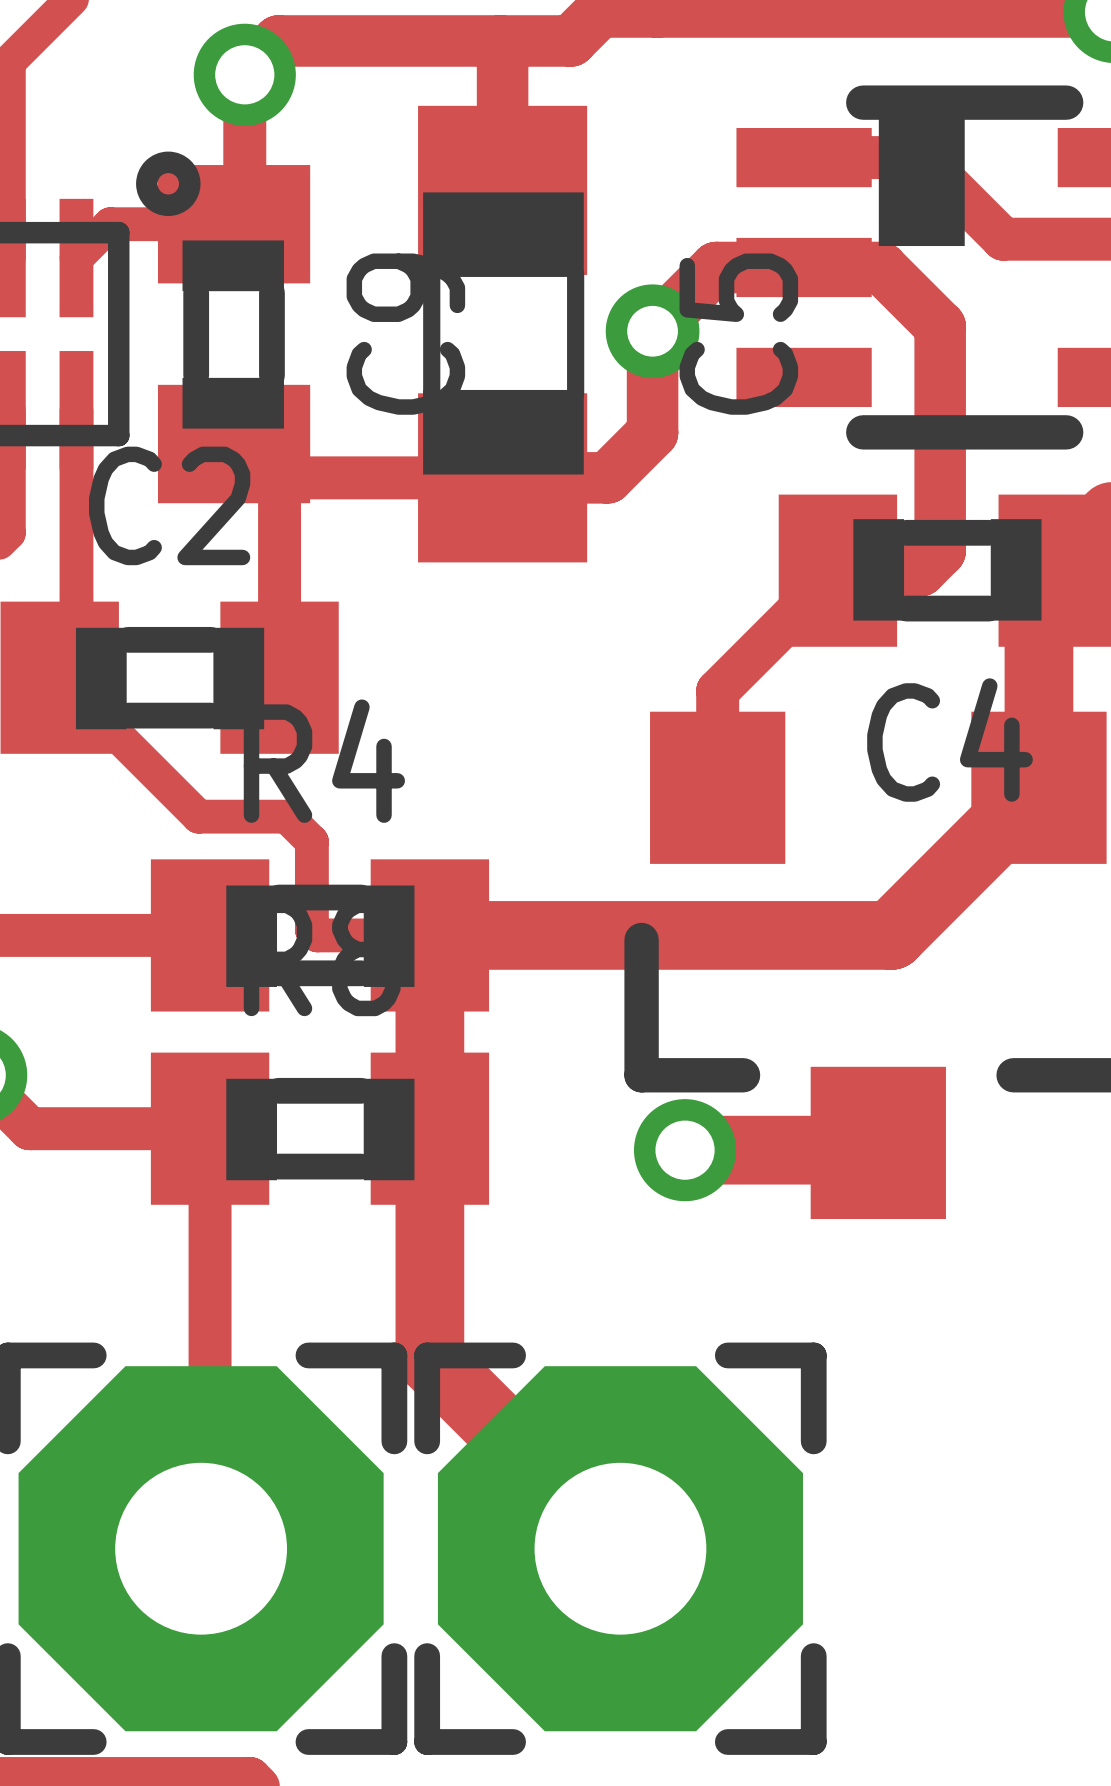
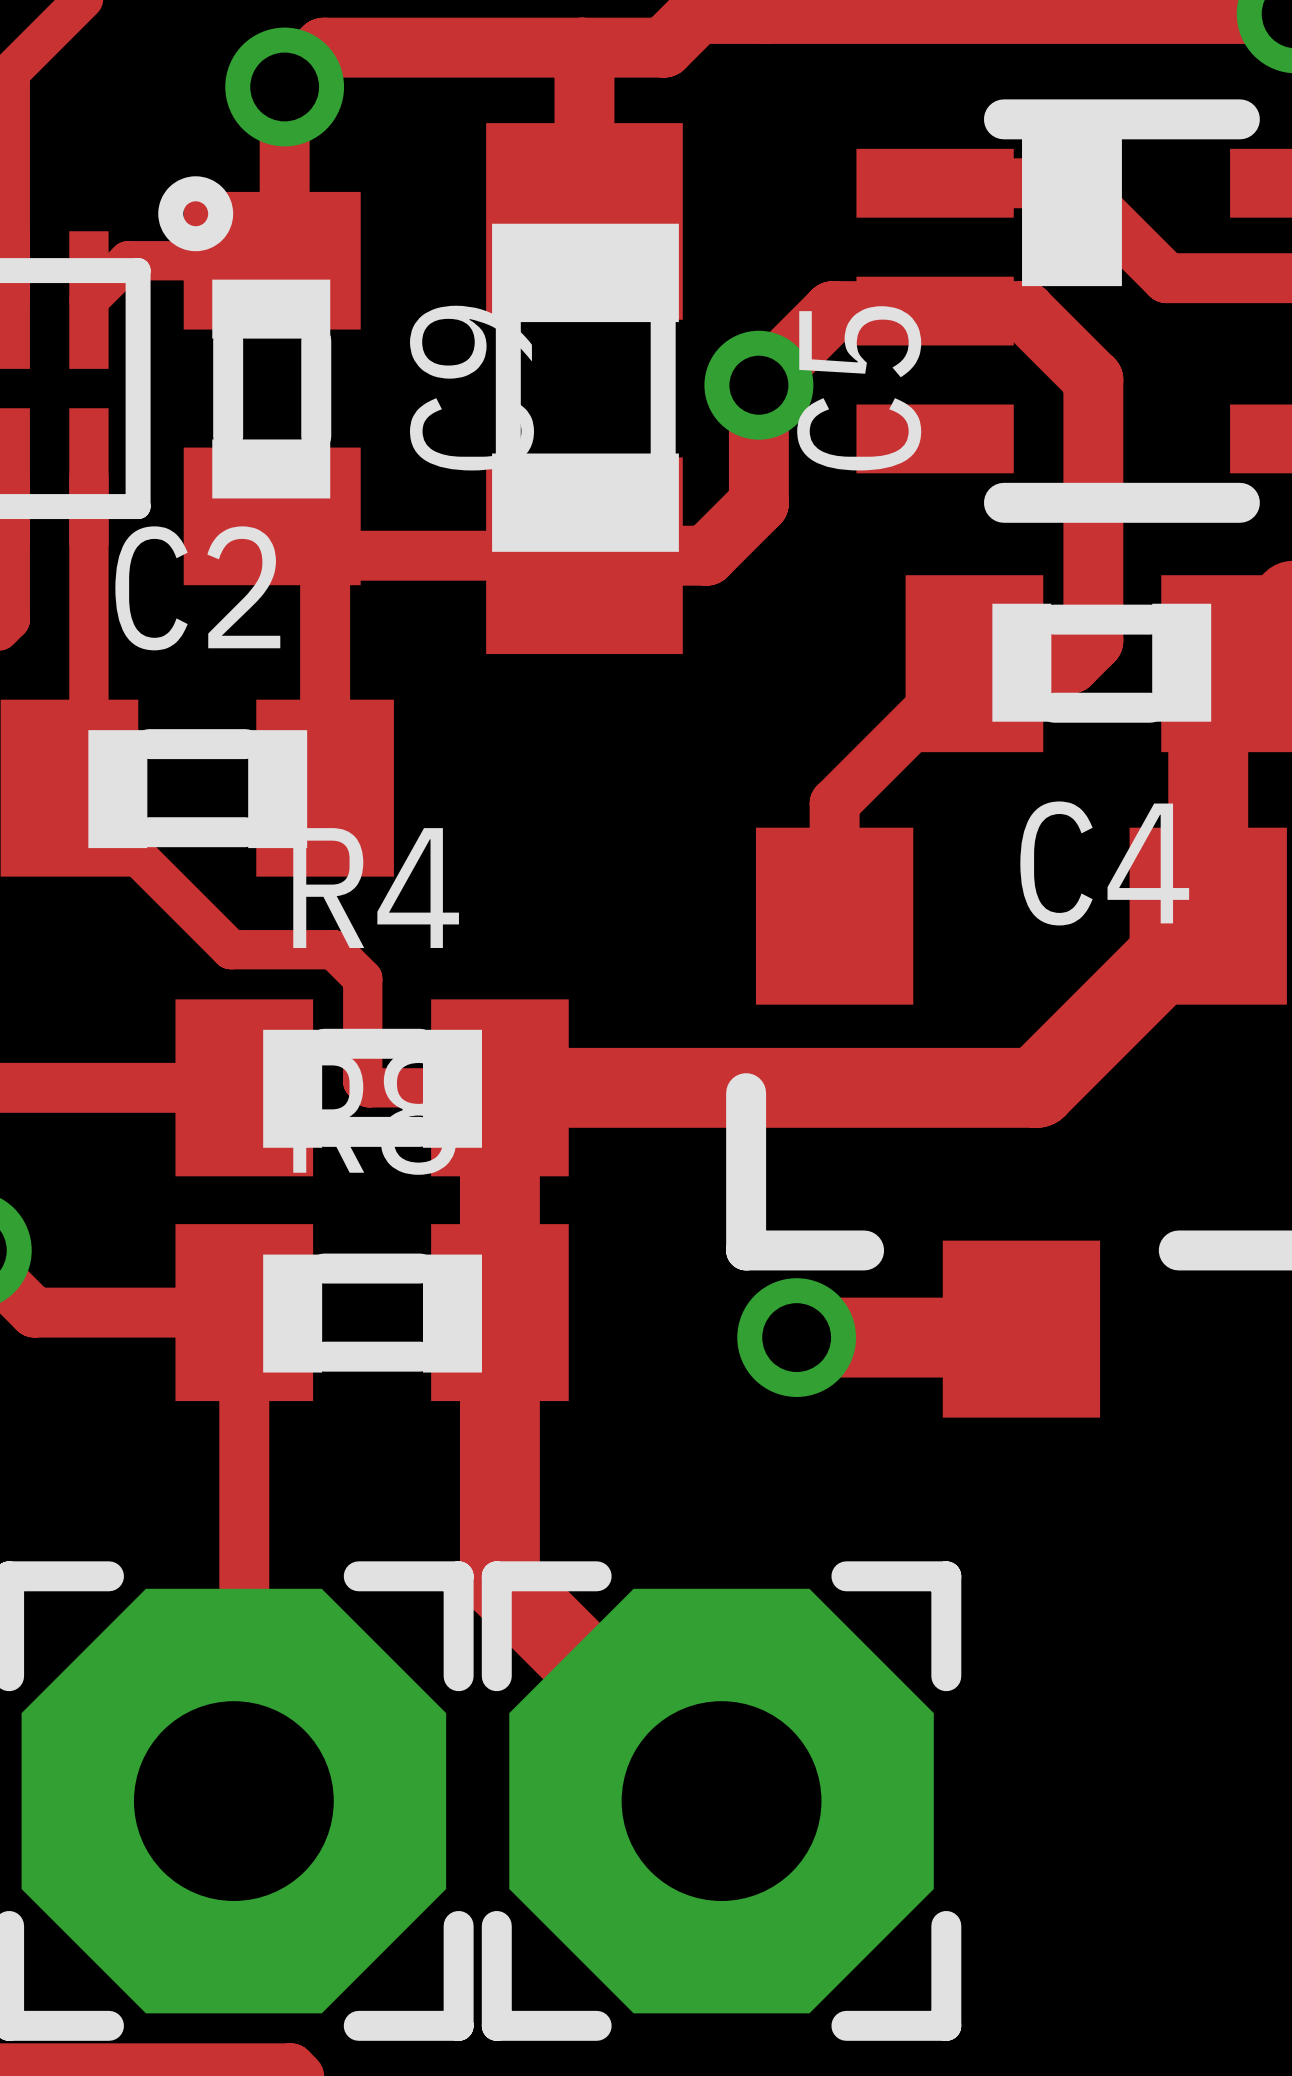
C5 footprint: [418, 105, 588, 563] -> [486, 123, 683, 655]

